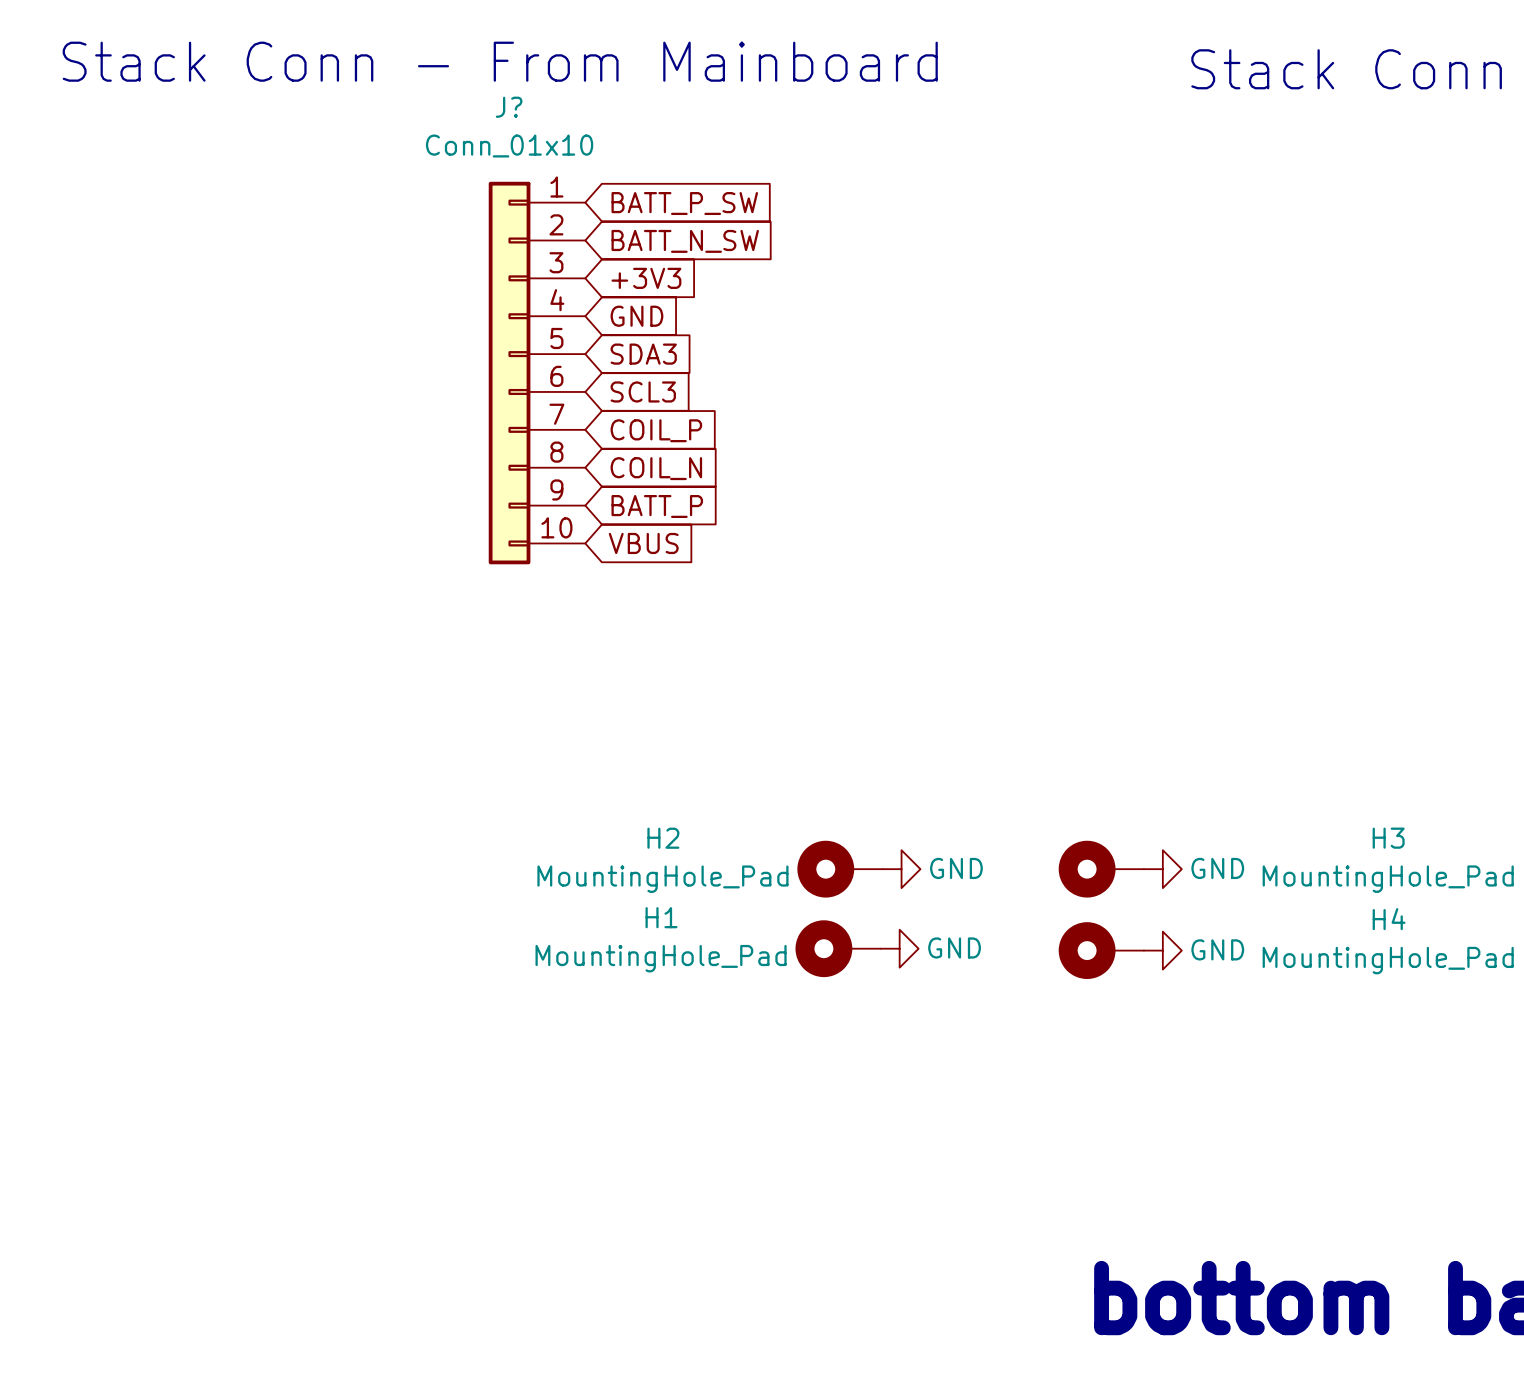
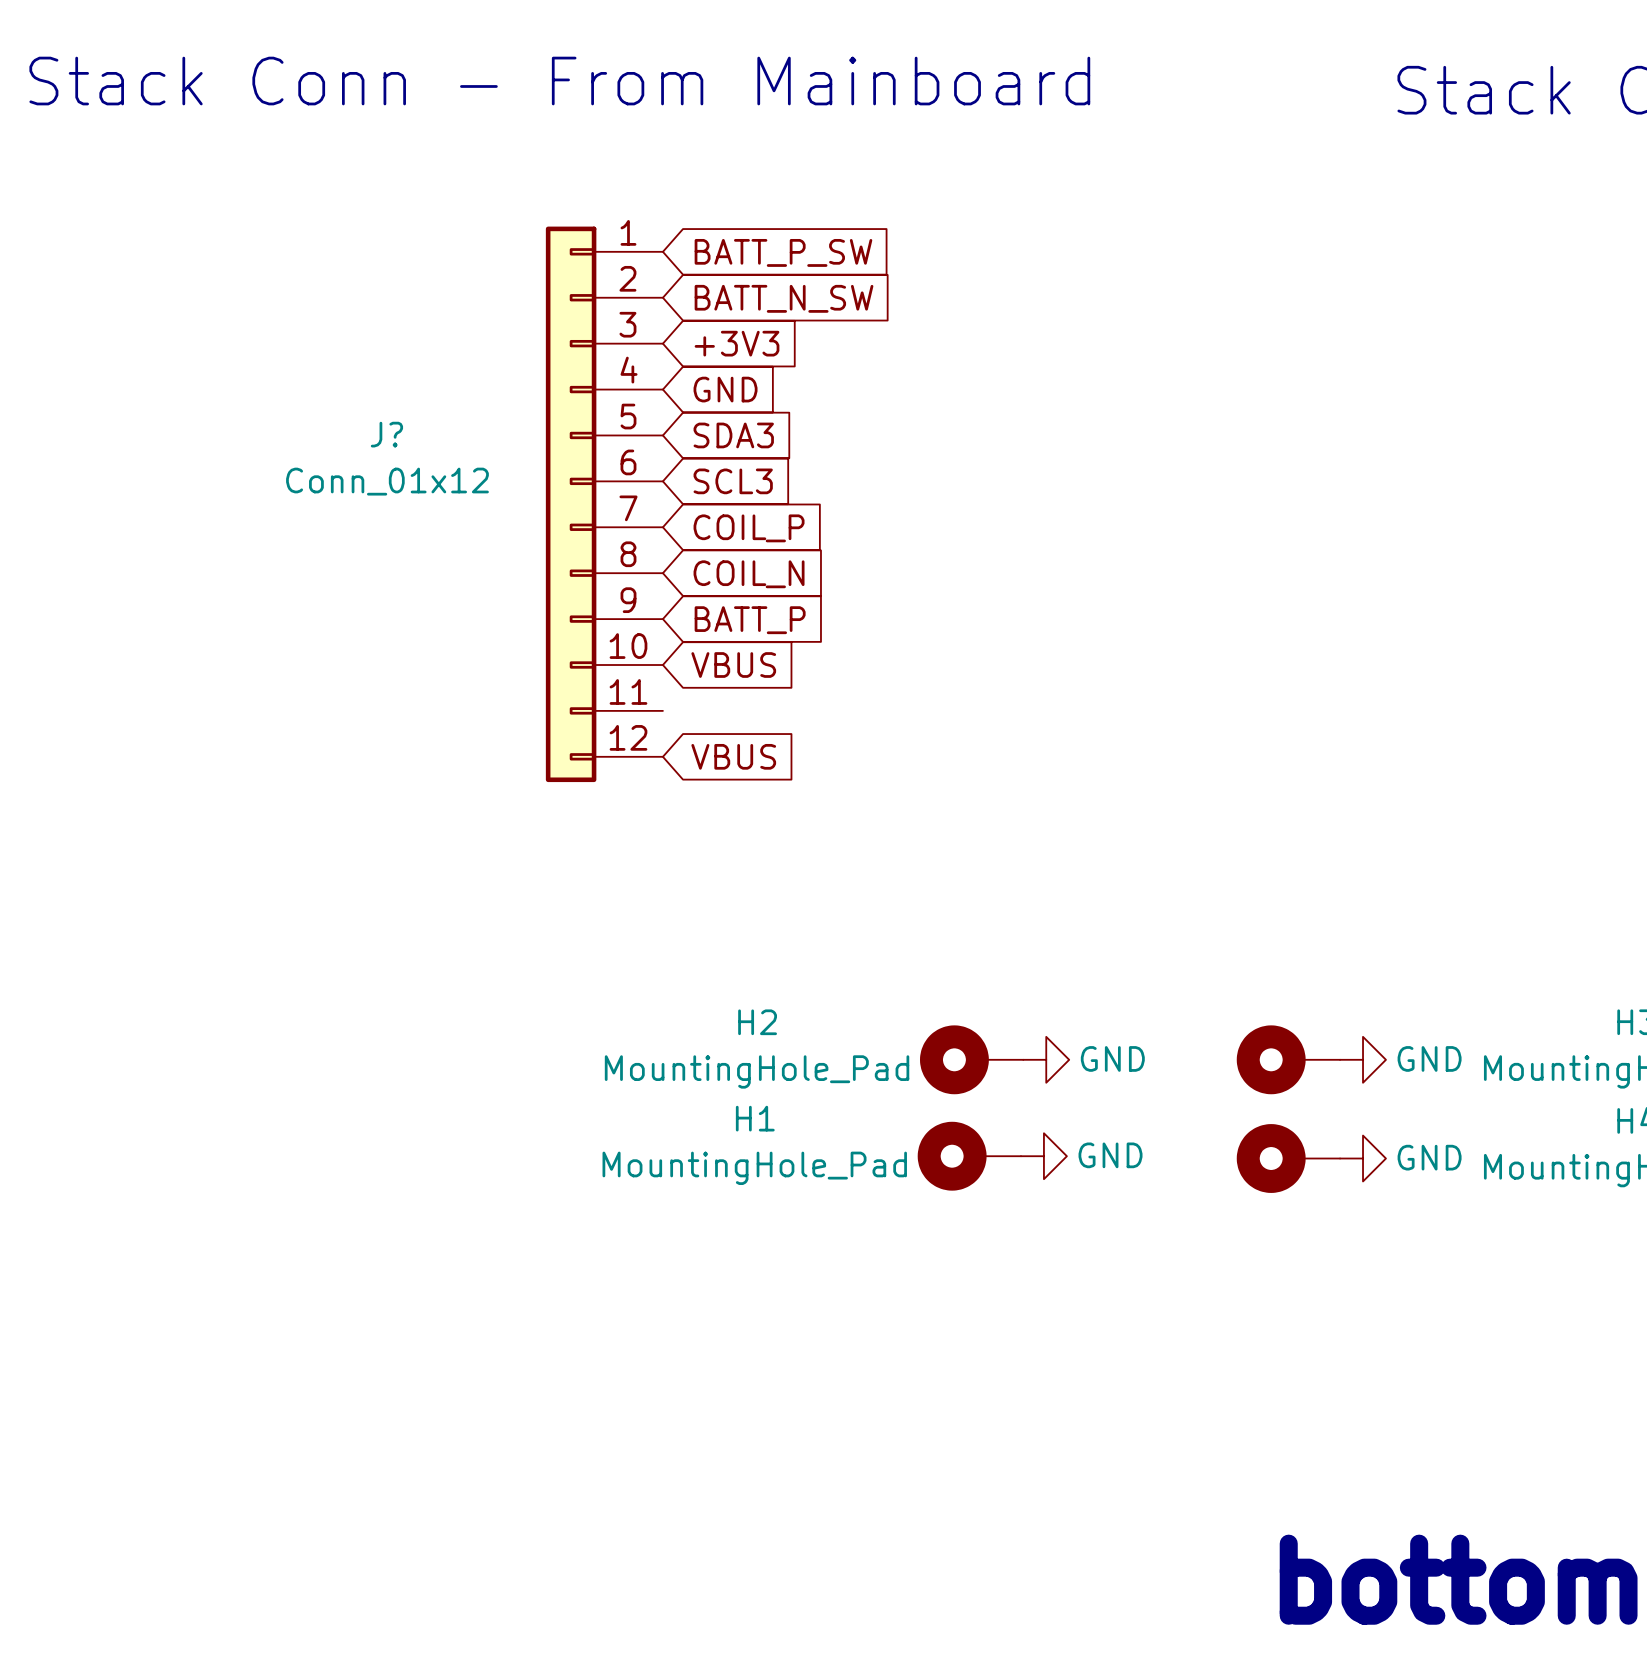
J?: Conn_01x10 (537, 373) -> none
J?: none -> Conn_01x12 (604, 504)
global label: none -> VBUS (733, 756)

